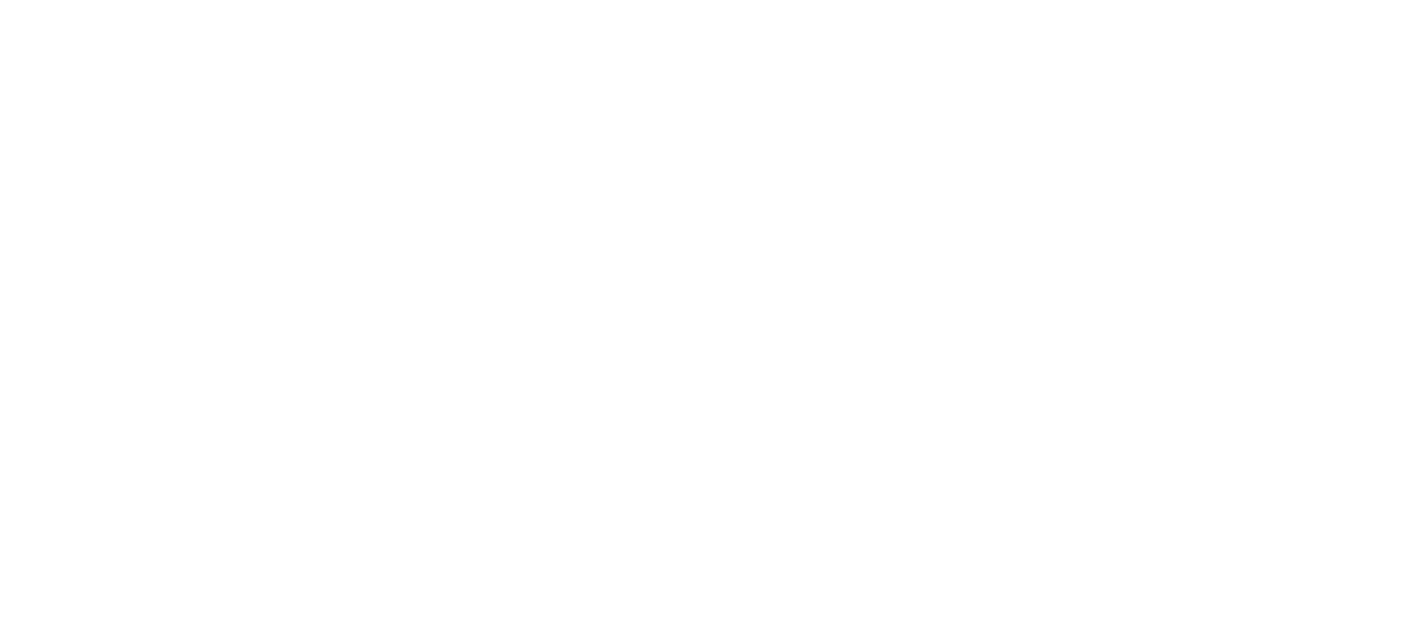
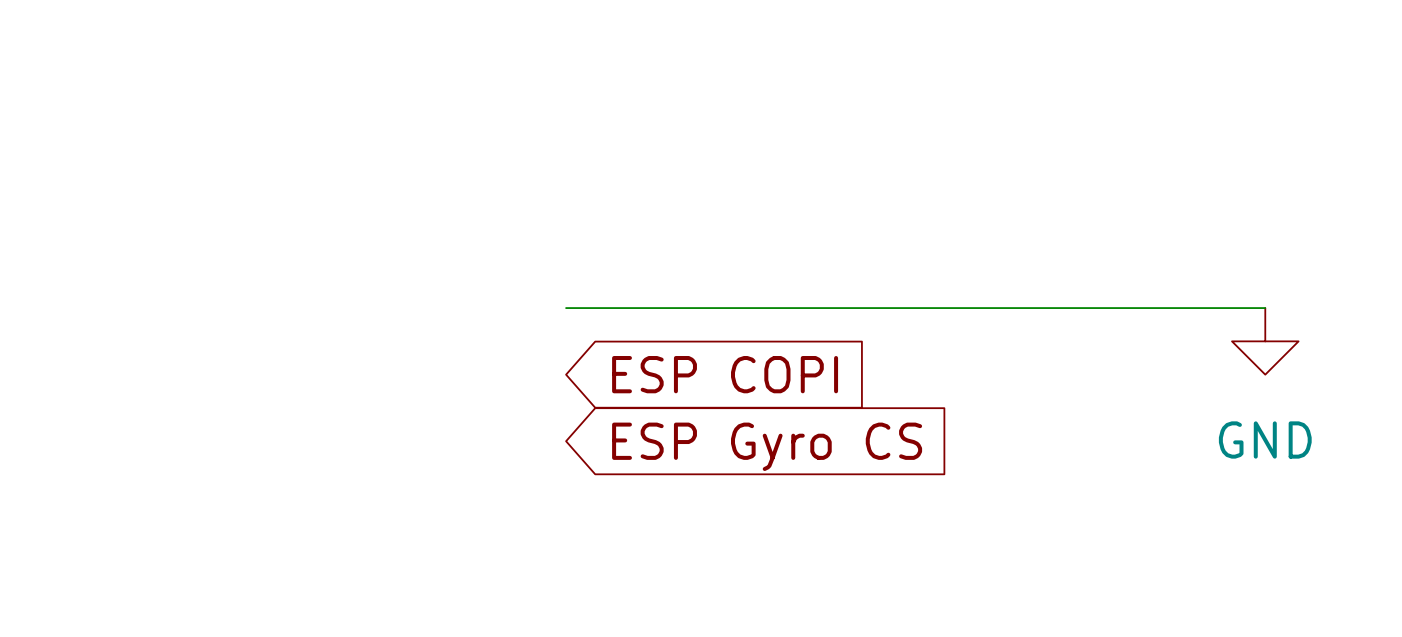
wire: none -> (566, 308) (1265, 308)
power symbol: none -> GND (1265, 341)
global label: none -> ESP COPI (725, 374)
global label: none -> ESP Gyro CS (767, 446)

